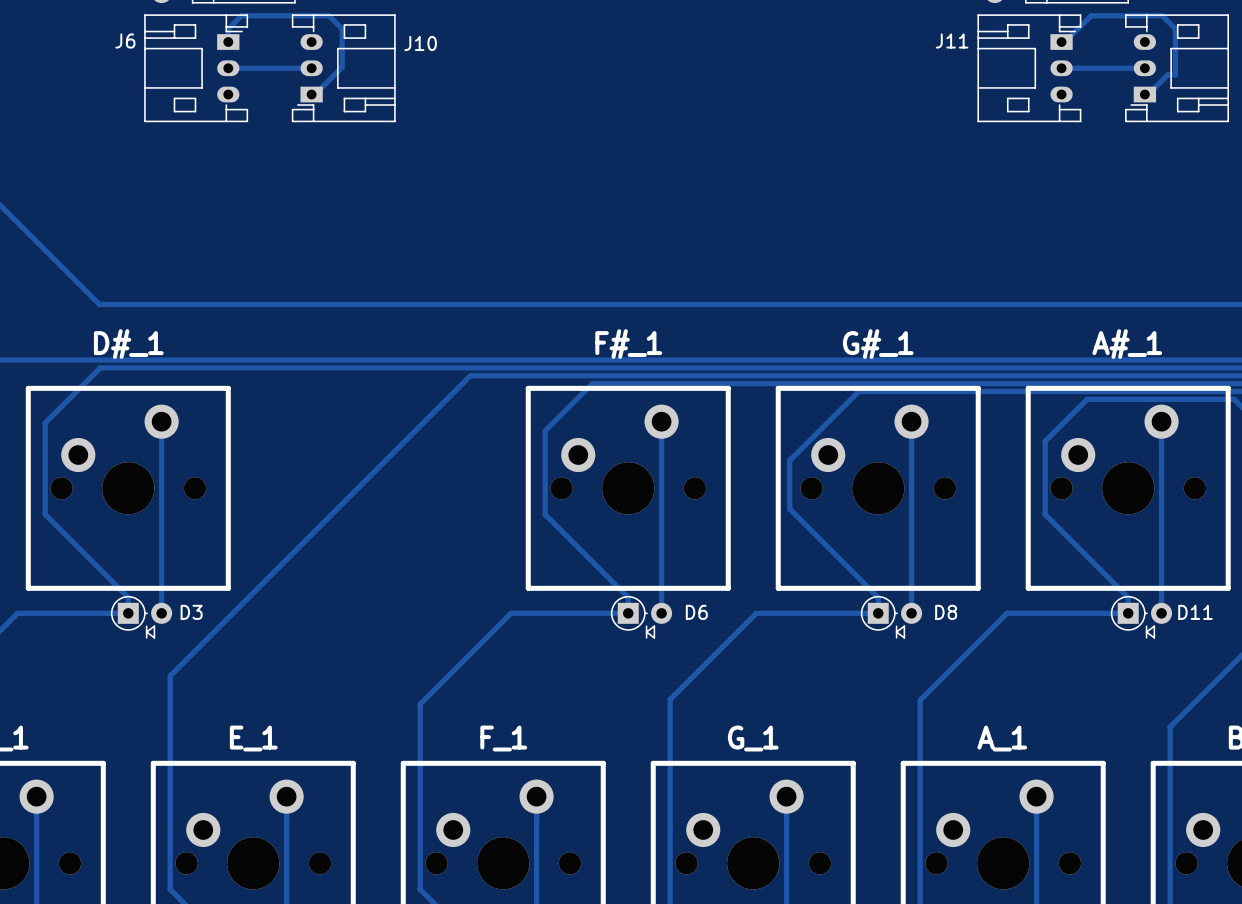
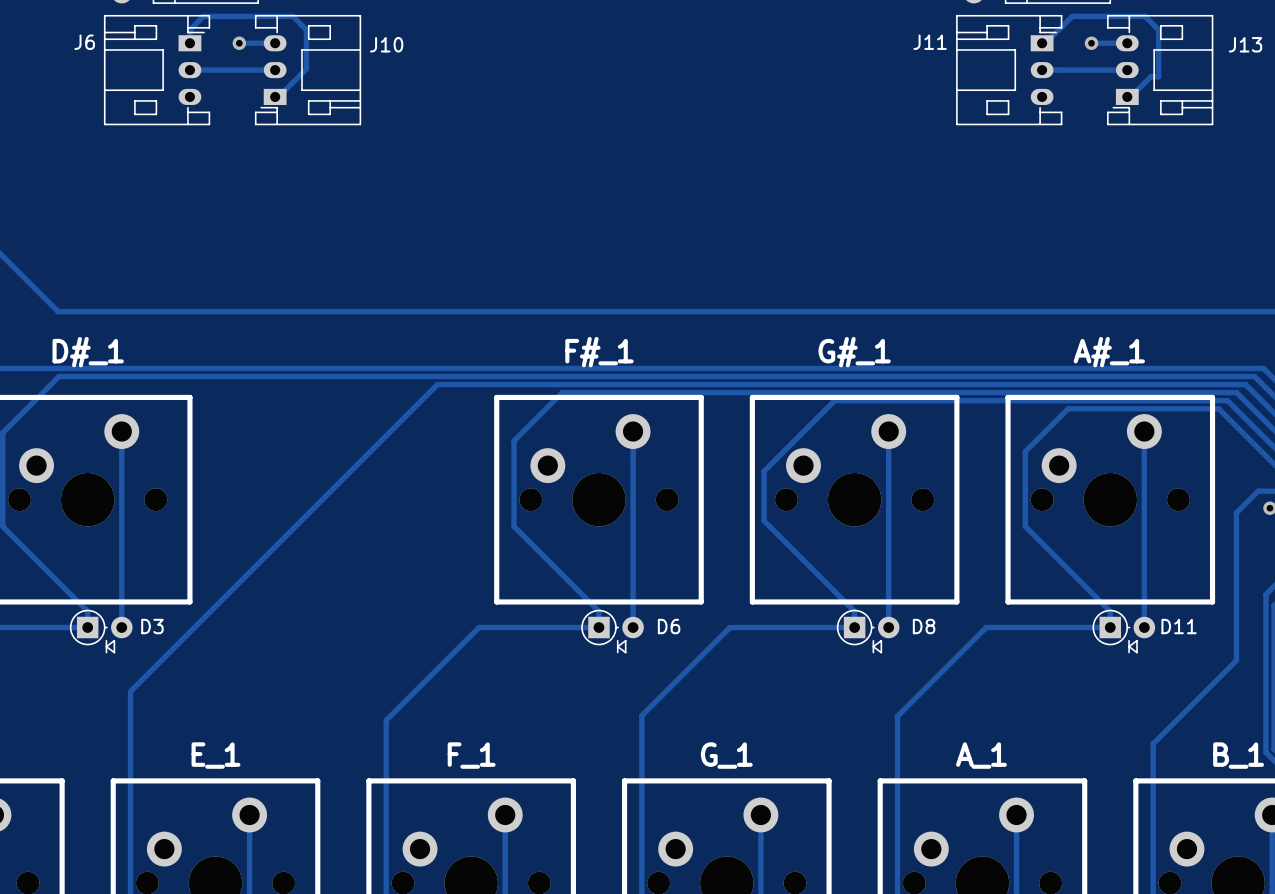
track: none -> (239, 43) (275, 43)
via: none -> (239, 43)
track: none -> (1091, 43) (1127, 43)
via: none -> (1091, 43)

